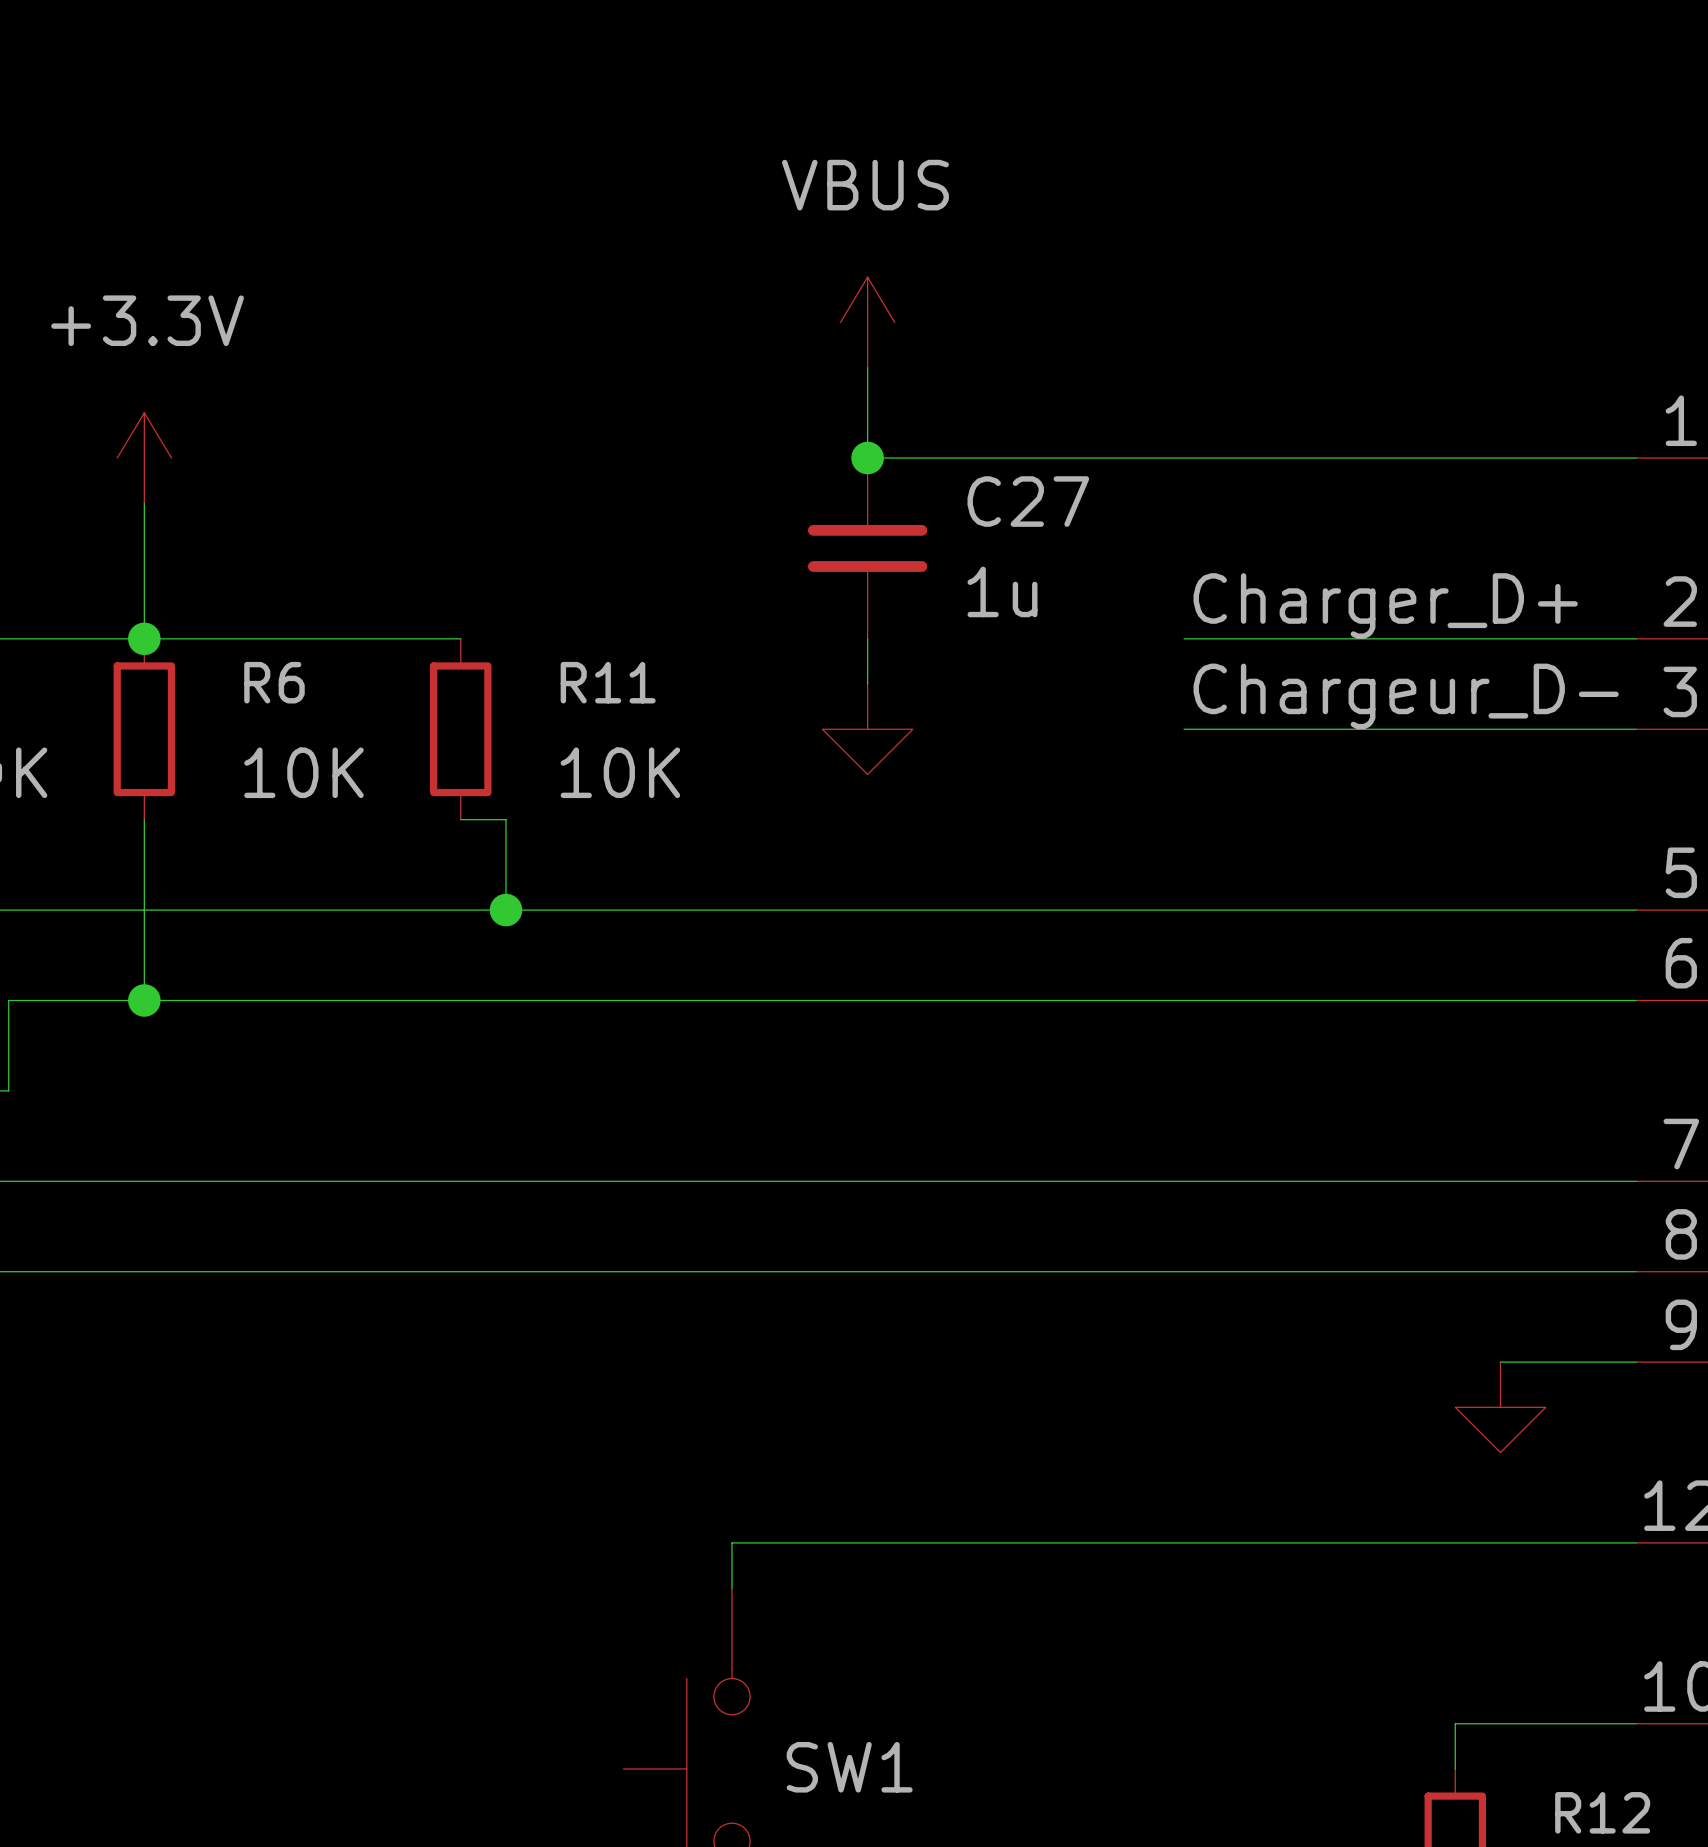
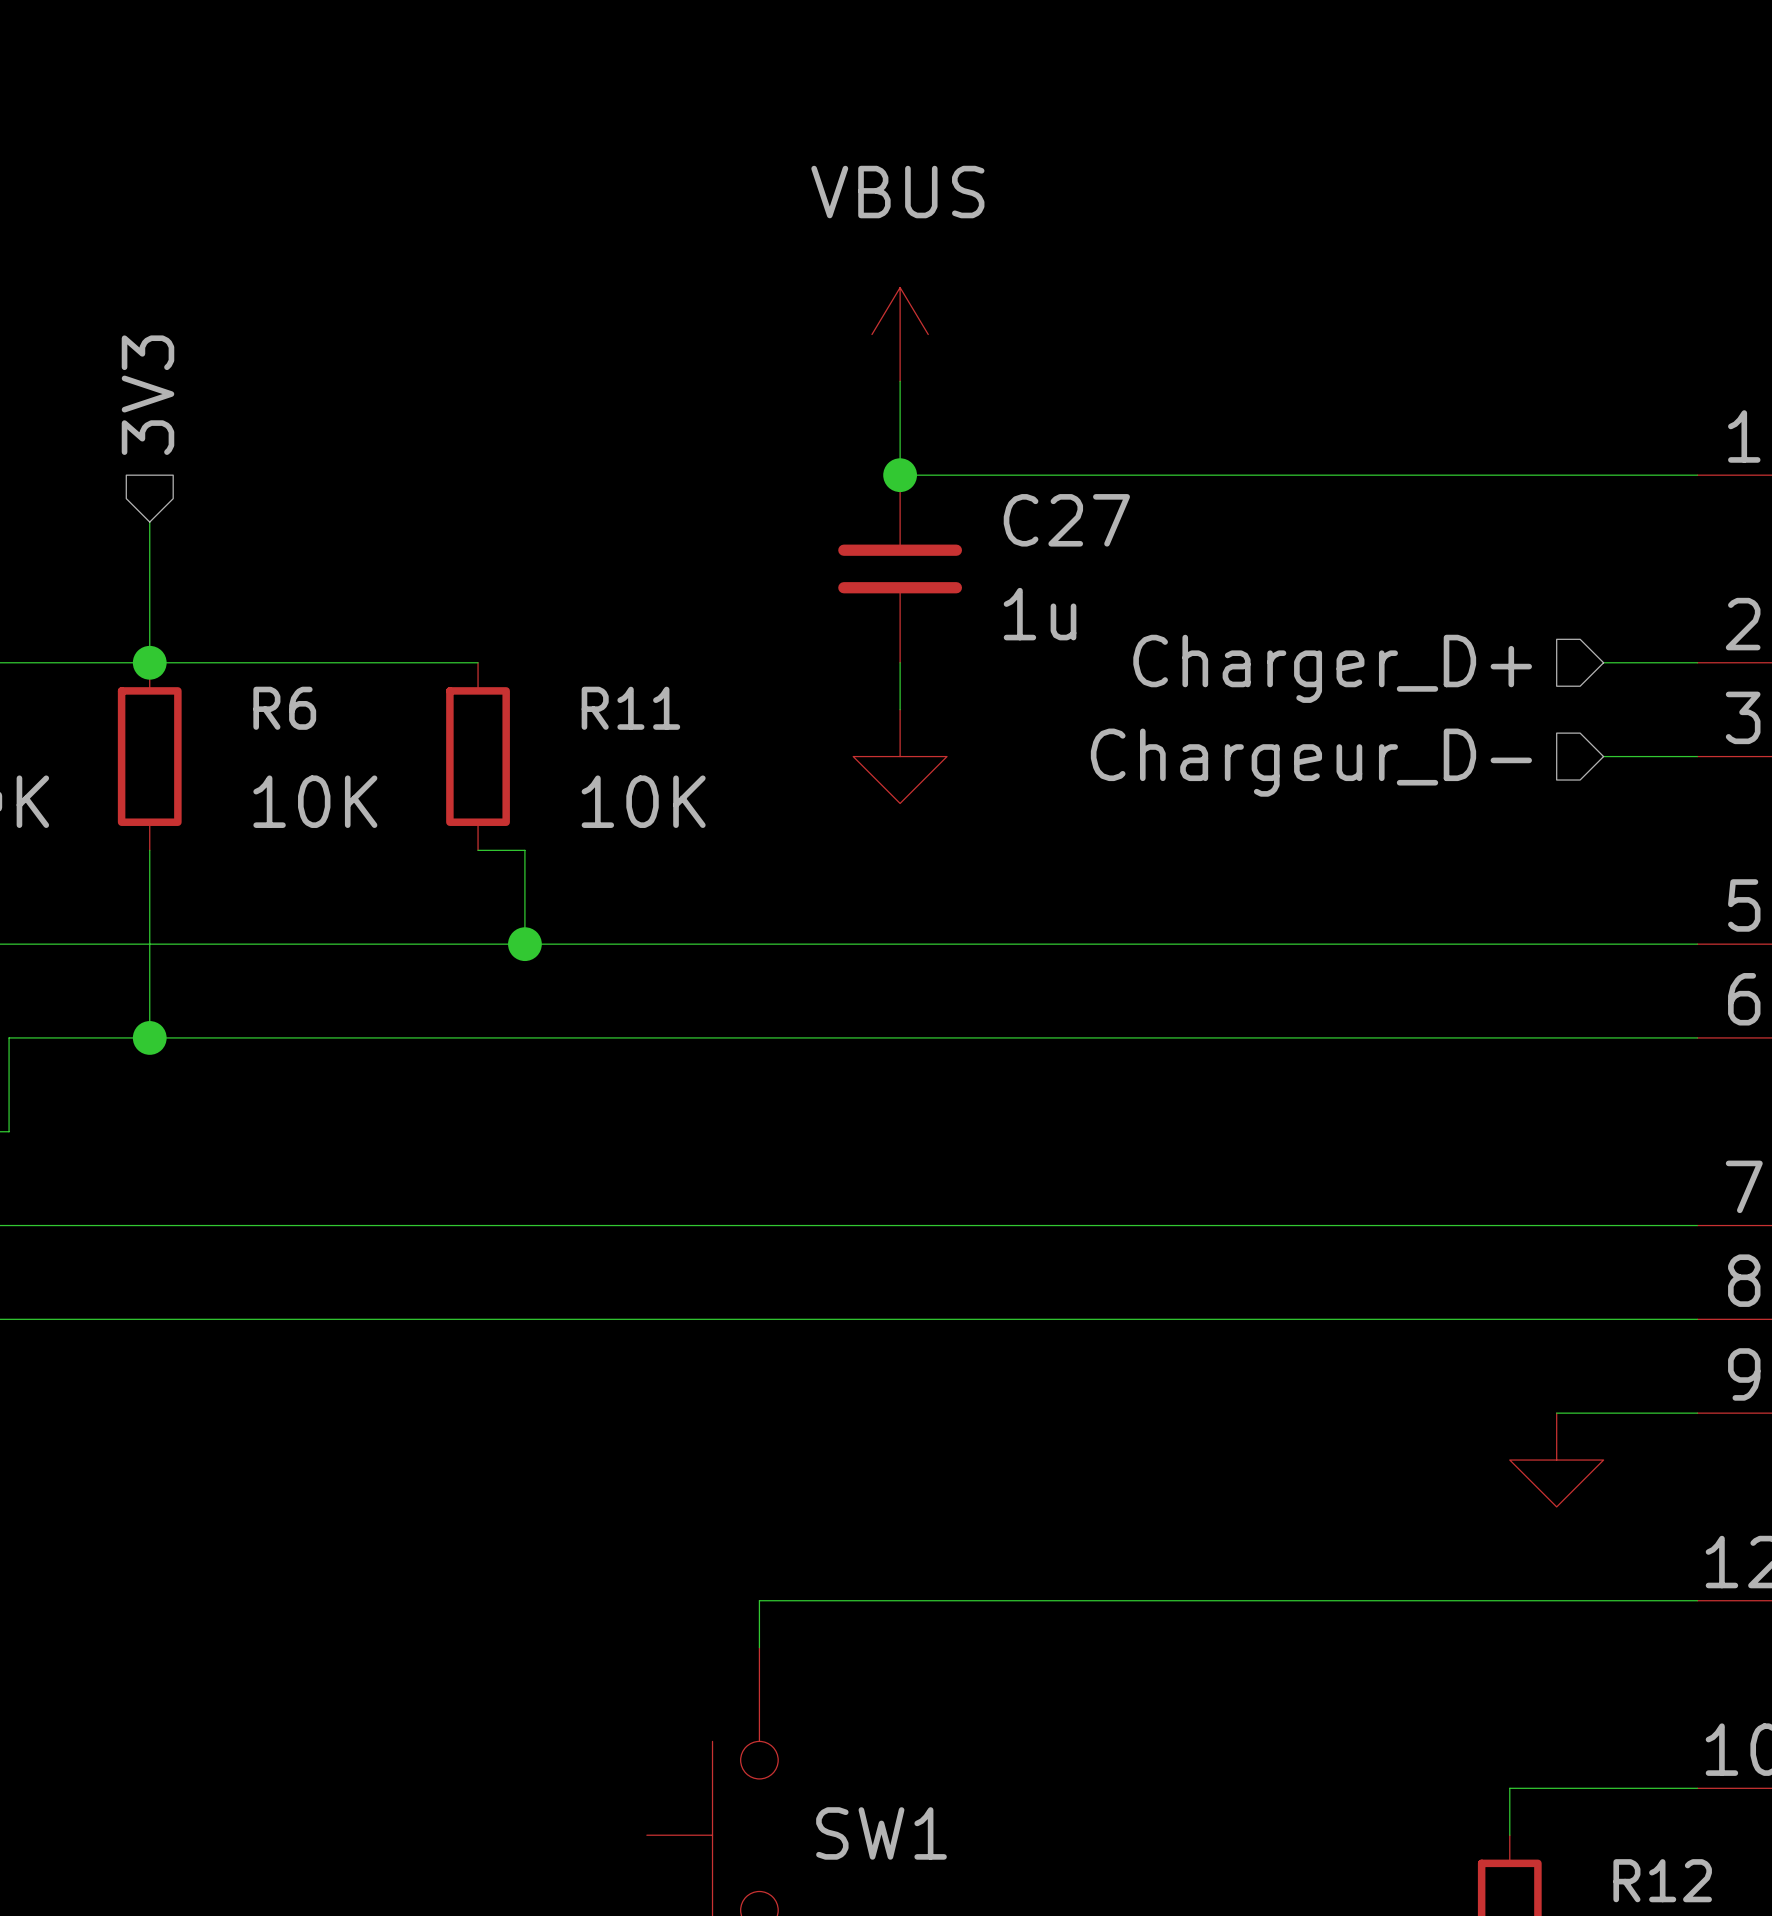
hierarchical label: none -> 3V3 (147, 395)
power symbol: +3.3V (144, 458) -> none
label: Charger_D+ (1385, 606) -> none
wire: (1184, 638) (1545, 638) -> none
hierarchical label: none -> Charger_D+ (1332, 668)
label: Chargeur_D- (1406, 696) -> none
wire: (1184, 729) (1545, 729) -> none
hierarchical label: none -> Chargeur_D- (1311, 762)

